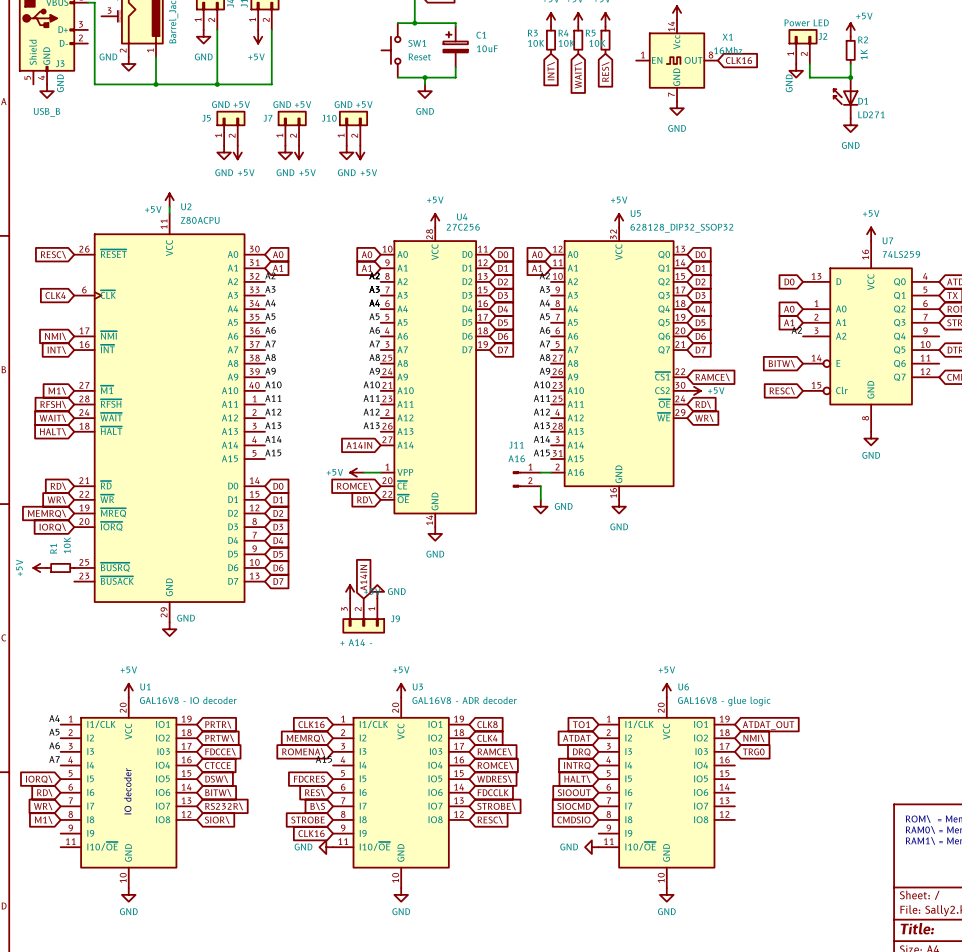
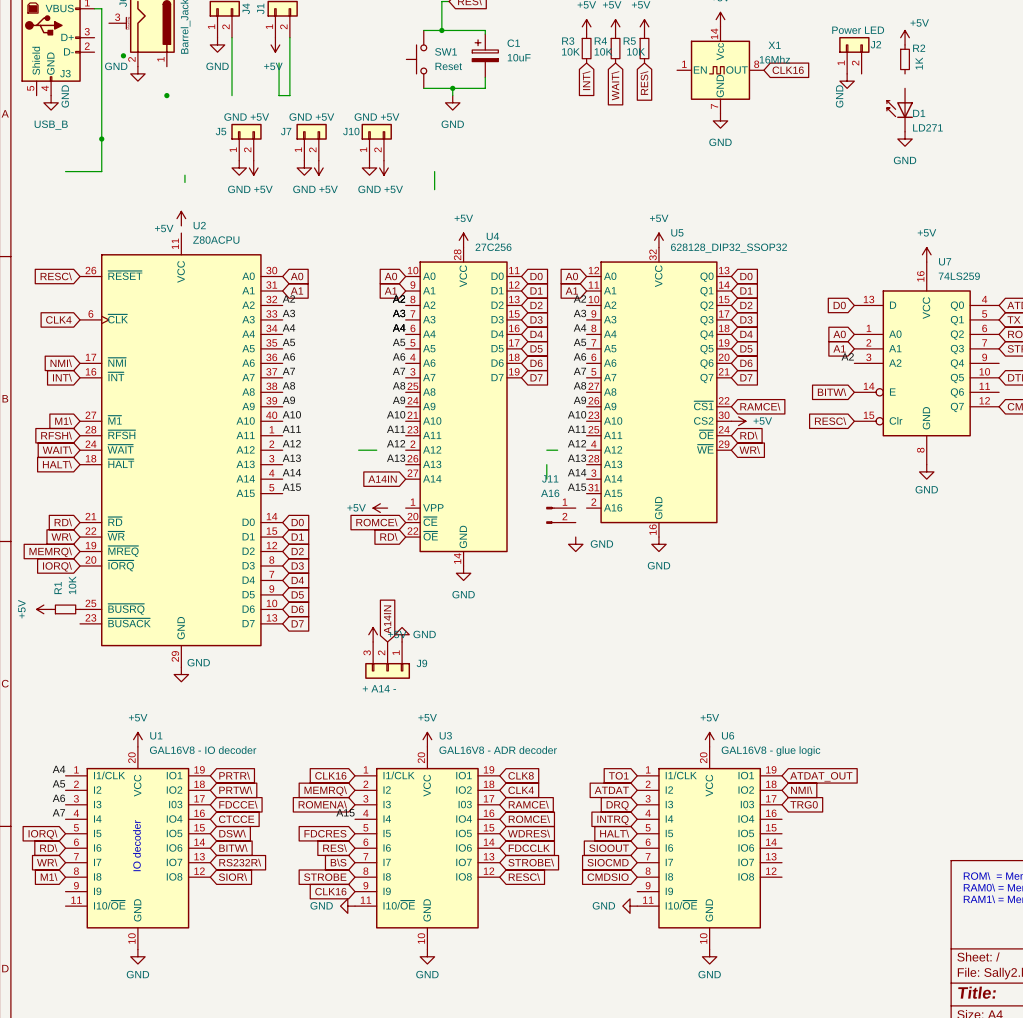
junction: none -> (123, 55)
wire: (156, 57) (156, 84) -> none
wire: (809, 63) (809, 77) (850, 77) (850, 63) -> none
junction: (850, 77) -> none
wire: (94, 84) (261, 84) -> (279, 63) (279, 95)
wire: none -> (101, 95) (101, 171) (65, 171)
junction: (217, 84) -> none
junction: none -> (101, 139)
wire: none -> (434, 171) (434, 189)
wire: (169, 207) (169, 213) -> (184, 175) (184, 182)
wire: (363, 472) (380, 472) -> (358, 450) (376, 450)
wire: (540, 472) (551, 472) -> (546, 450) (557, 450)
wire: (540, 486) (540, 499) -> (546, 464) (546, 479)

